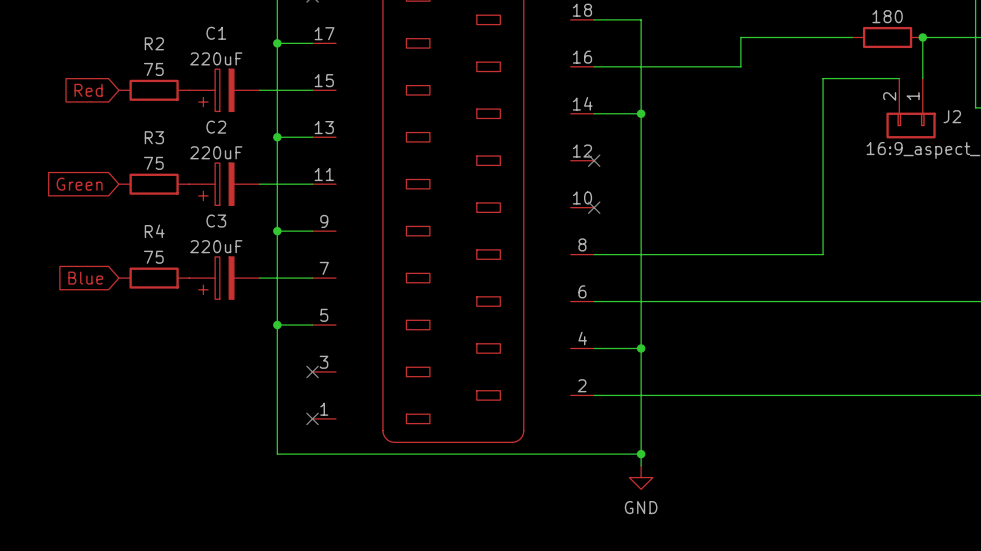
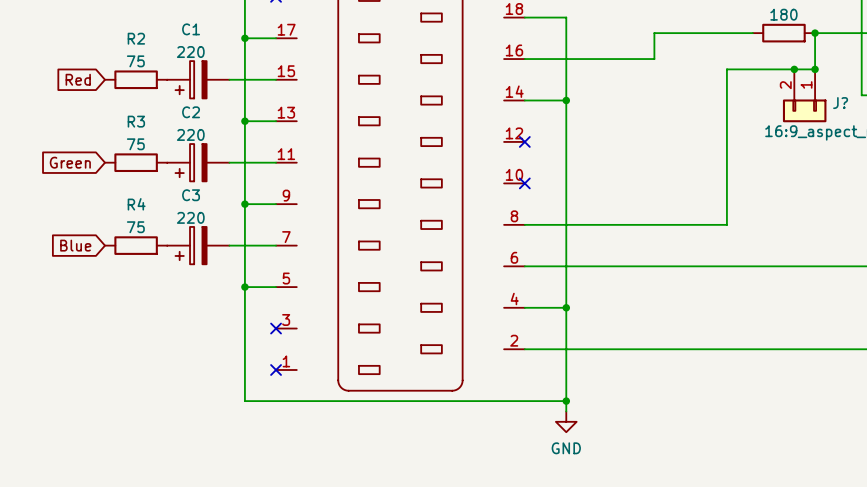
C1 value: 220uF (216, 58) -> 220 (190, 52)
wire: none -> (794, 69) (815, 69)
junction: none -> (794, 69)
junction: none -> (815, 69)
J2 name: J2 (952, 116) -> J? (840, 103)
C2 value: 220uF (216, 152) -> 220 (190, 134)
C3 value: 220uF (216, 246) -> 220 (190, 217)

